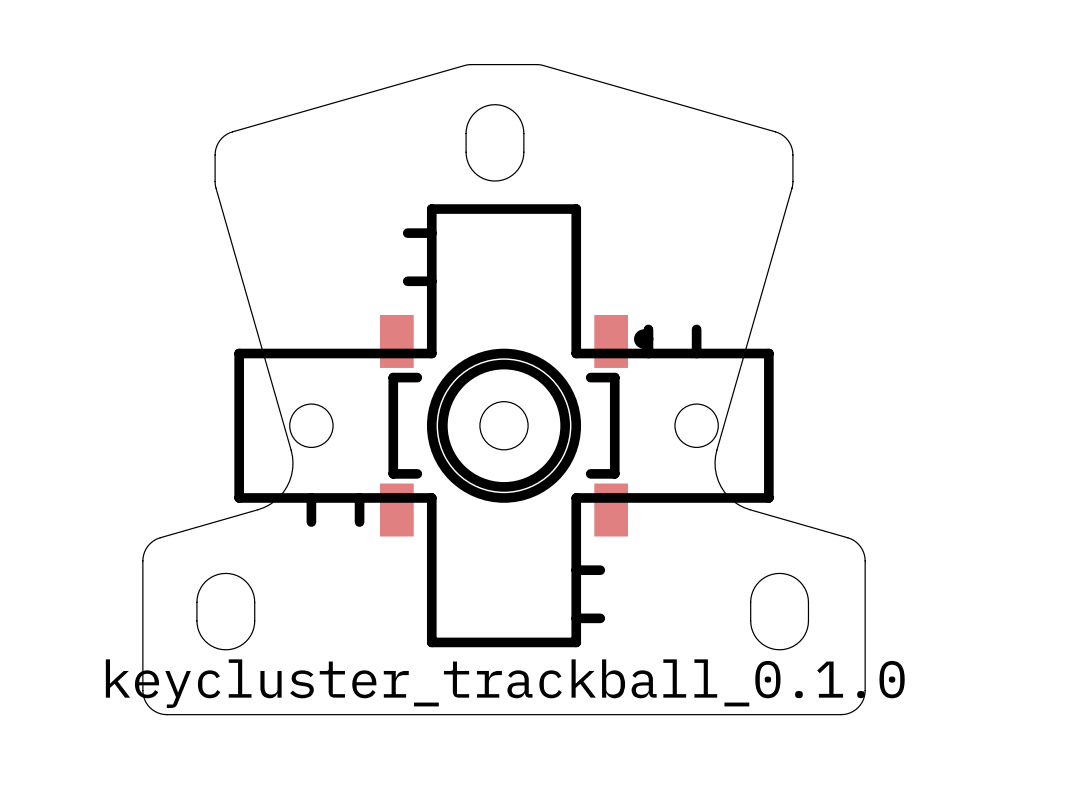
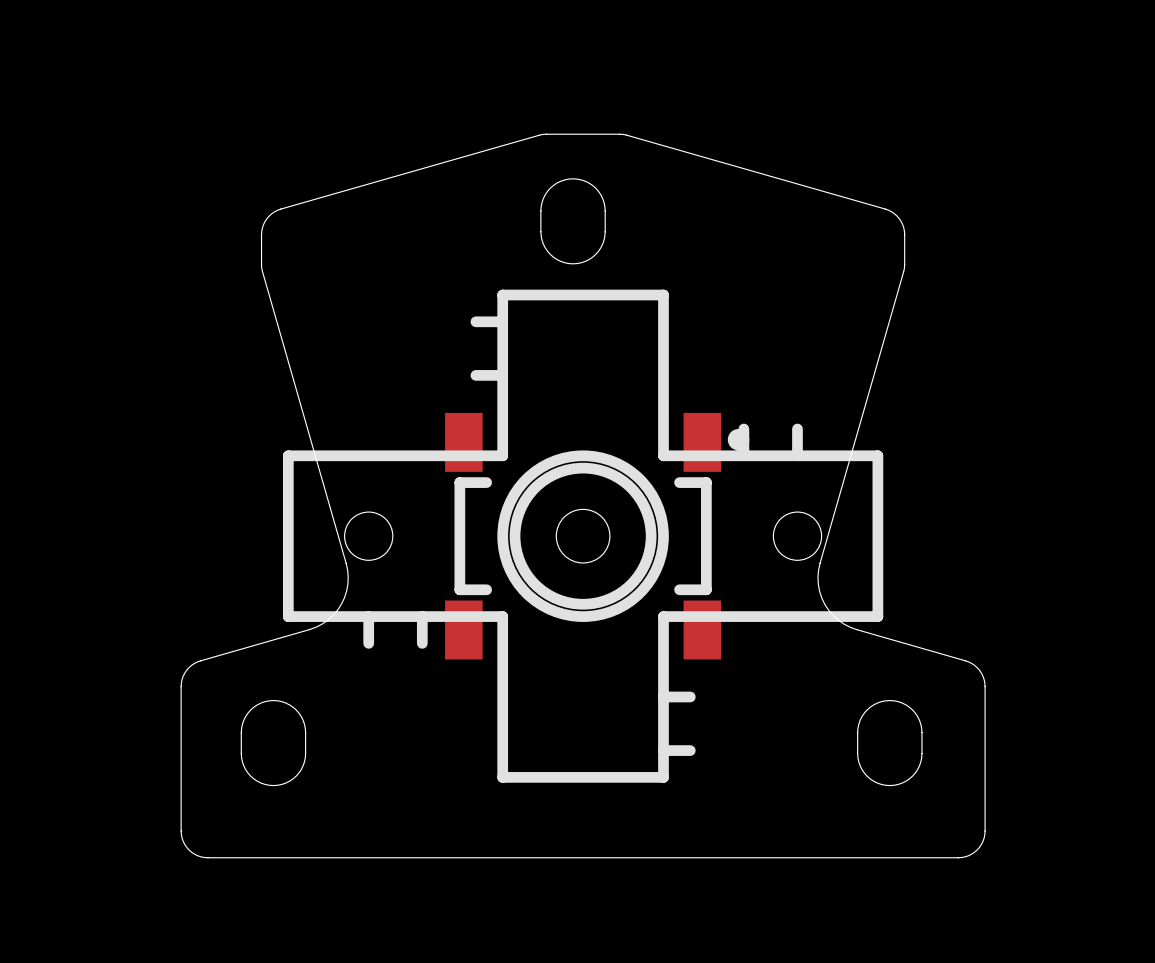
text: keycluster_trackball_0.1.0 (505, 683) -> none

